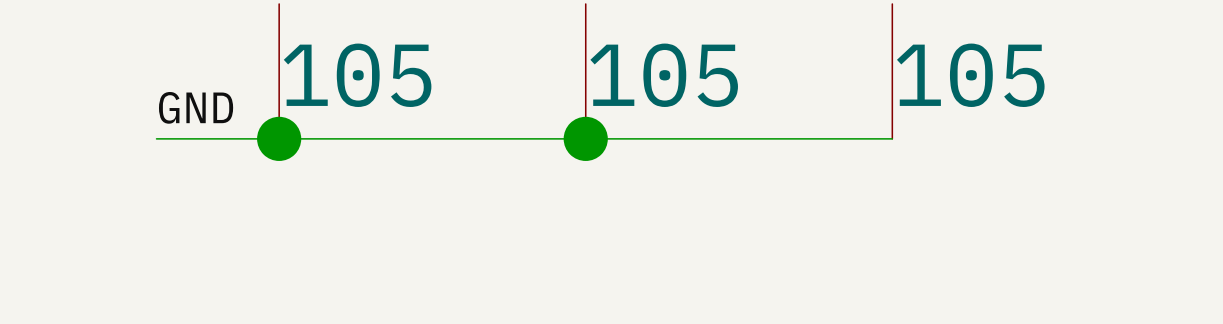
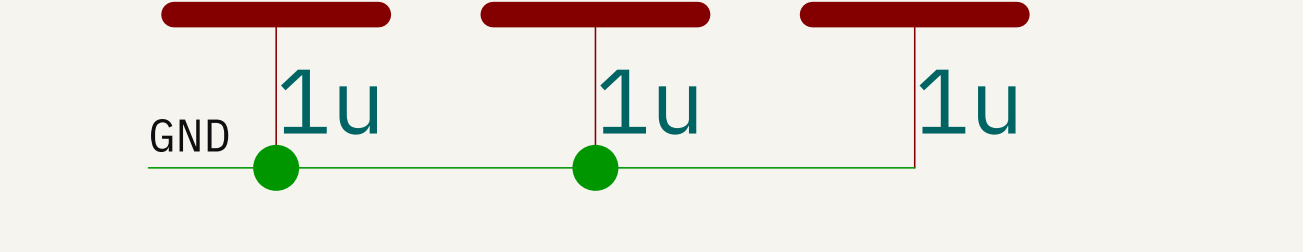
part value: 105 (357, 75) -> 1u (329, 102)
part value: 105 (664, 75) -> 1u (648, 102)
part value: 105 (970, 75) -> 1u (967, 102)

